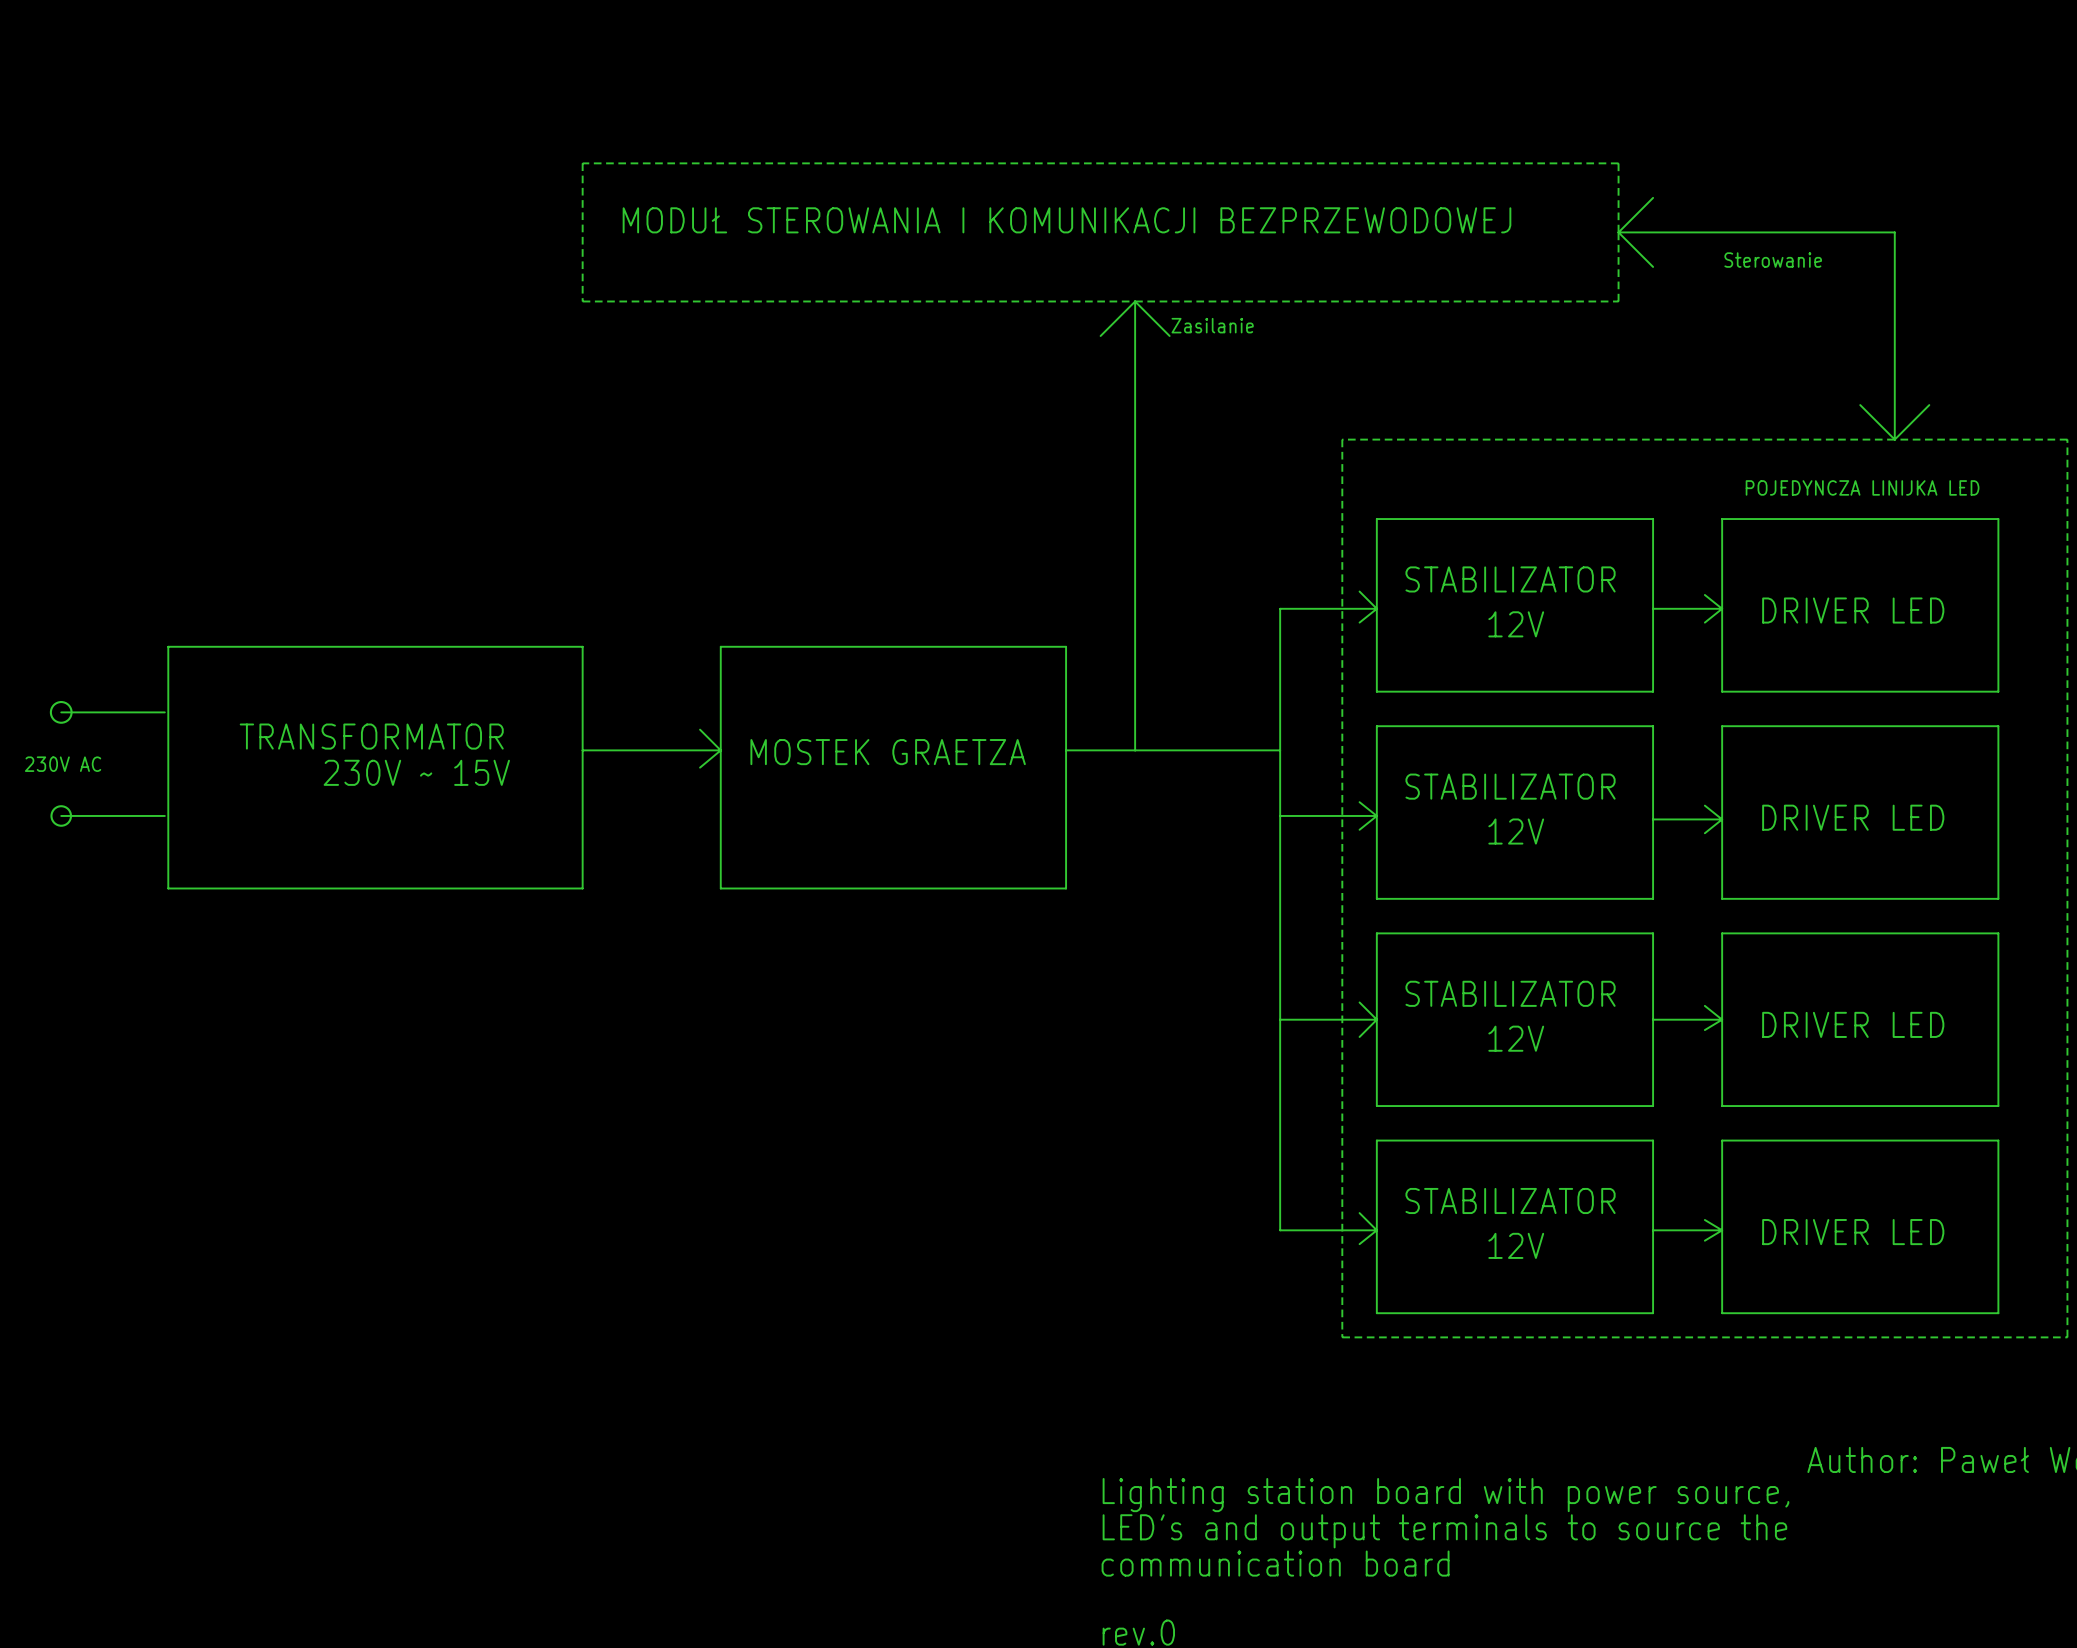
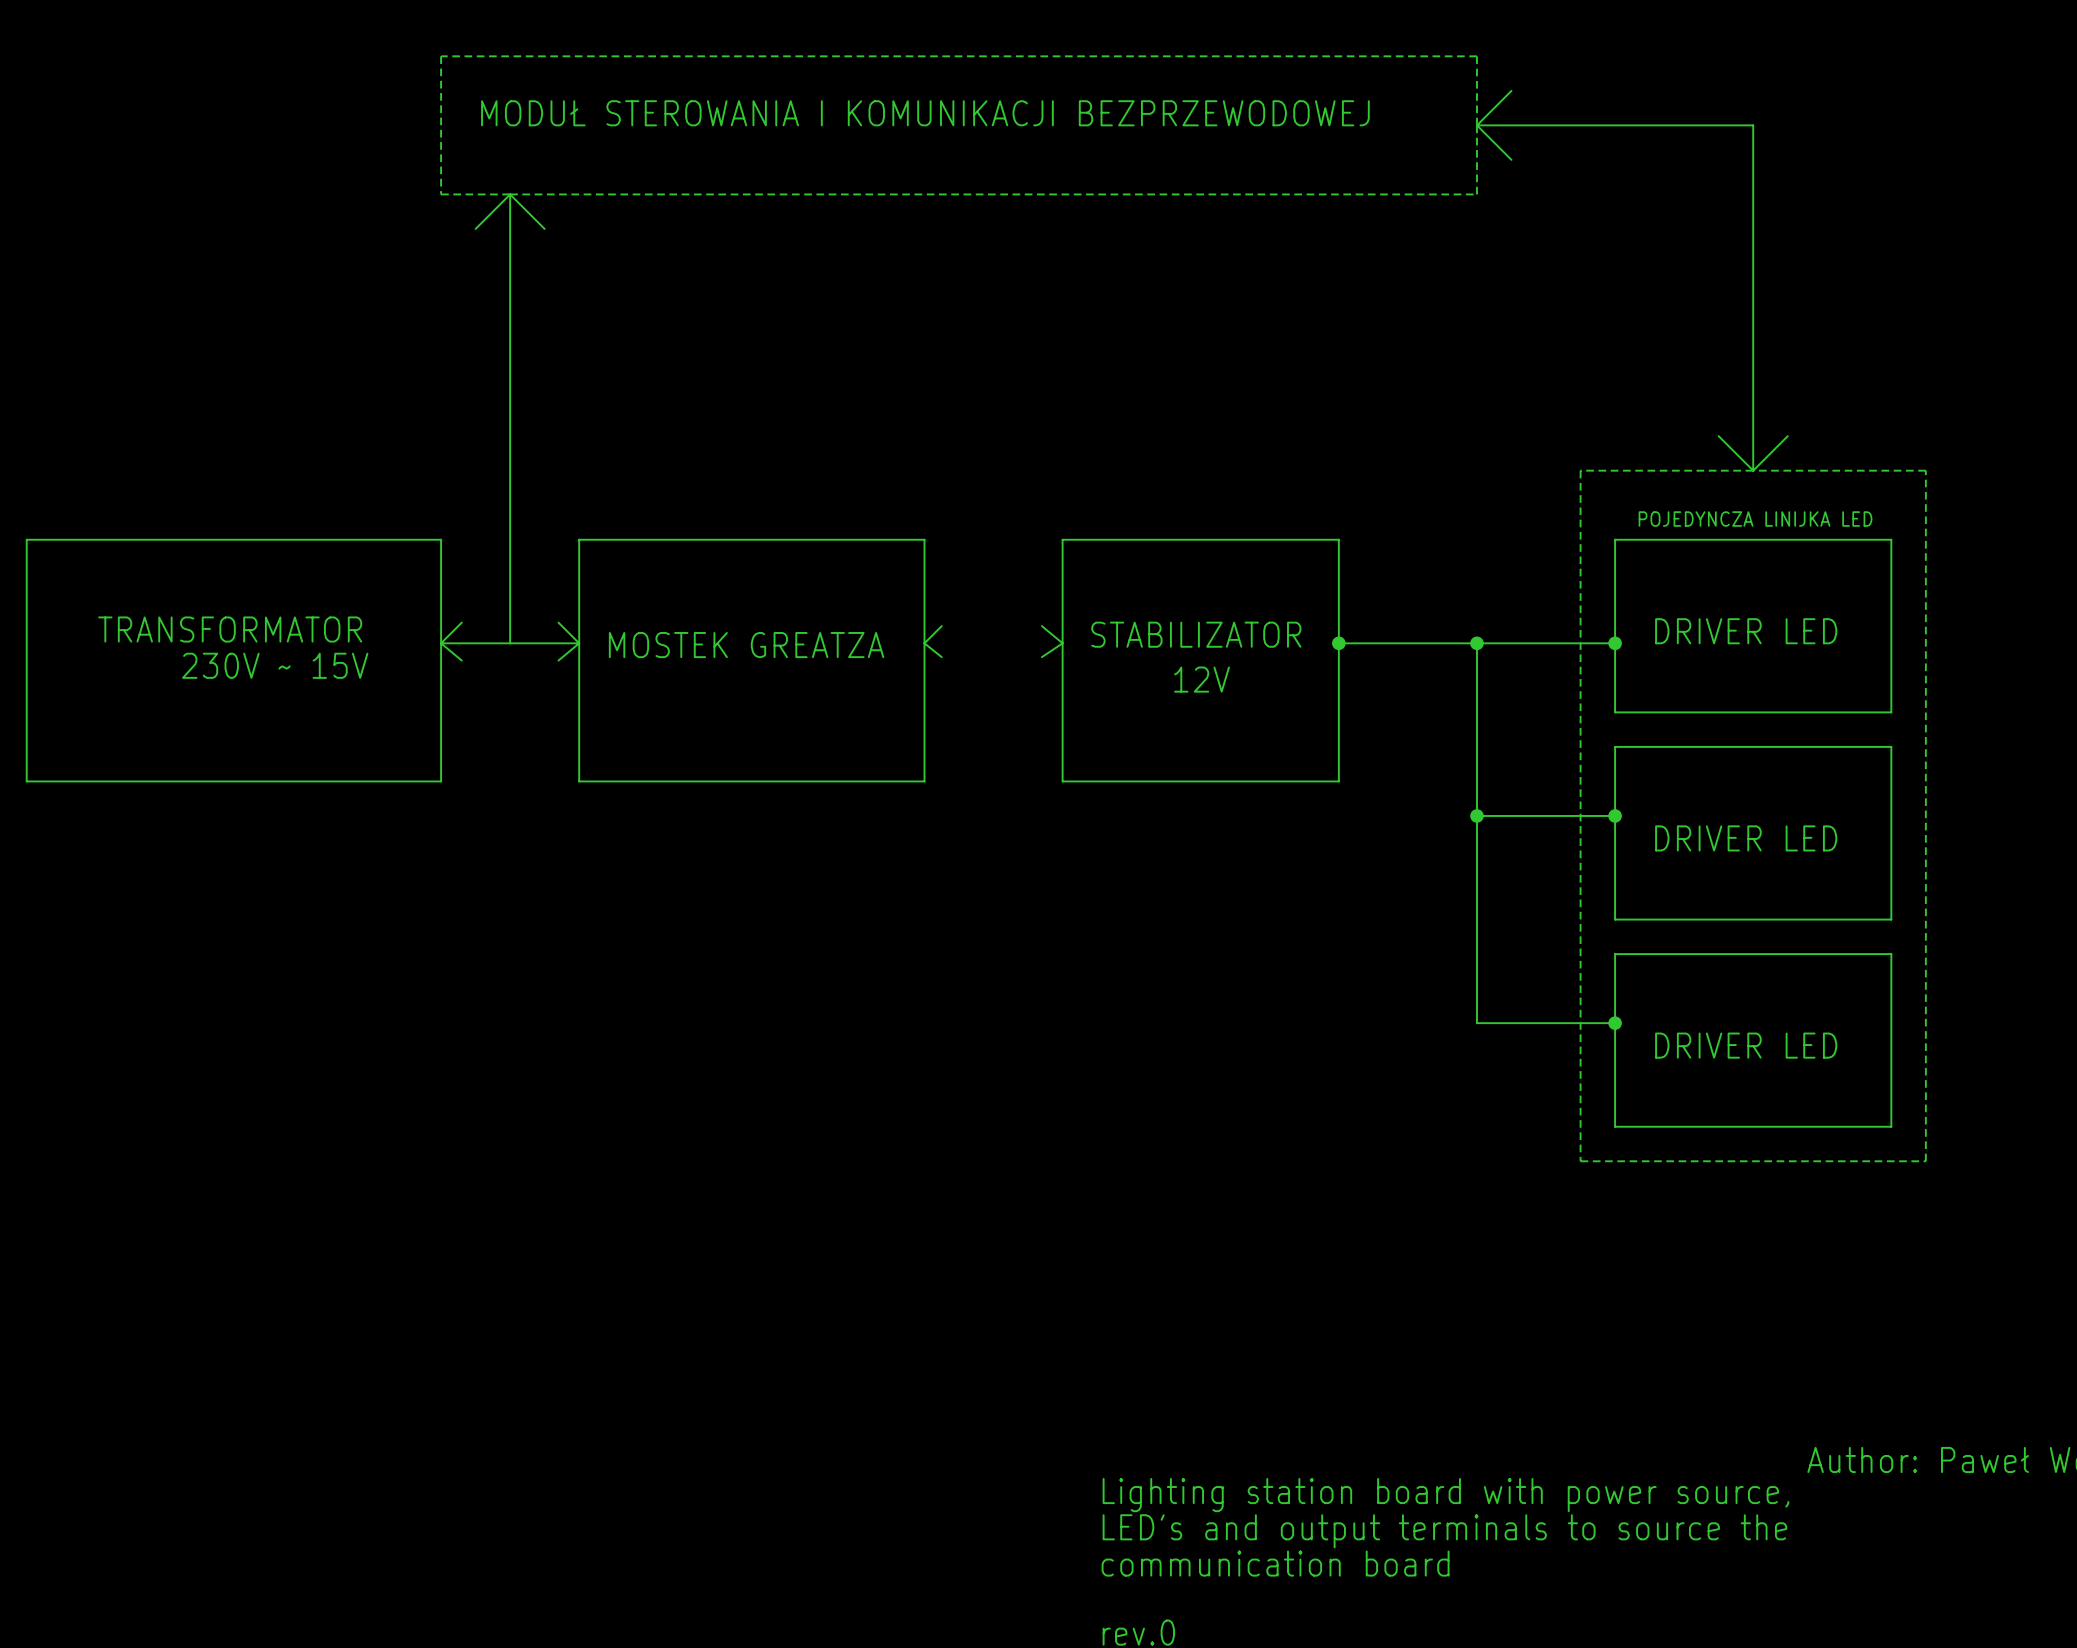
wire: none -> (1476, 125) (1753, 125) (1753, 470)
wire: (582, 163) (1618, 163) (1618, 301) (582, 301) (582, 163) -> (441, 56) (1476, 56) (1476, 194) (441, 194) (441, 56)
wire: none -> (510, 194) (510, 643)
wire: none -> (510, 194) (475, 228)
wire: none -> (510, 194) (544, 228)
wire: (1653, 197) (1618, 232) -> (1511, 90) (1476, 125)
text position: MODUŁ STEROWANIA I KOMUNIKACJI BEZPRZEWODOWEJ (1066, 220) -> MODUŁ STEROWANIA I KOMUNIKACJI BEZPRZEWODOWEJ (925, 113)
wire: (1618, 232) (1653, 266) -> (1476, 125) (1511, 159)
wire: (1618, 232) (1894, 232) (1894, 439) -> none
text: Sterowanie (1773, 260) -> none
wire: (1135, 301) (1135, 750) -> none
wire: (1135, 301) (1100, 336) -> none
wire: (1135, 301) (1169, 336) -> none
text: Zasilanie (1212, 325) -> none
wire: (1860, 405) (1894, 439) -> (1718, 436) (1753, 470)
wire: (1929, 405) (1894, 439) -> (1787, 436) (1753, 470)
wire: (1342, 439) (1342, 1337) (2067, 1337) (2067, 439) (1342, 439) -> none
wire: none -> (1580, 470) (1580, 1161) (1925, 1161) (1925, 470) (1580, 470)
text position: POJEDYNCZA LINIJKA LED (1862, 487) -> POJEDYNCZA LINIJKA LED (1755, 519)
wire: (1376, 519) (1376, 691) (1653, 691) (1653, 519) (1376, 519) -> none
wire: (1722, 519) (1998, 519) (1998, 691) (1722, 691) (1722, 519) -> (1615, 539) (1891, 539) (1891, 712) (1615, 712) (1615, 539)
wire: none -> (1062, 539) (1338, 539) (1338, 781) (1062, 781) (1062, 539)
text: STABILIZATOR (1510, 579) -> none
wire: (1359, 591) (1376, 608) -> none
wire: (1704, 594) (1722, 608) -> none
wire: (1376, 608) (1280, 608) (1280, 1230) (1376, 1230) -> none
wire: (1376, 608) (1359, 622) -> none
wire: (1653, 608) (1722, 608) -> none
wire: (1722, 608) (1704, 622) -> none
text position: DRIVER LED (1853, 610) -> DRIVER LED (1746, 631)
wire: none -> (461, 622) (441, 643)
text: 12V (1516, 624) -> none
wire: none -> (941, 626) (924, 643) (941, 657)
wire: none -> (1041, 626) (1062, 643) (1041, 657)
text: none -> STABILIZATOR (1196, 634)
wire: none -> (441, 643) (461, 660)
wire: none -> (1338, 643) (1615, 643)
junction: none -> (1338, 643)
wire: none -> (1476, 643) (1476, 1023) (1615, 1023)
junction: none -> (1476, 643)
junction: none -> (1615, 643)
text: none -> MOSTEK GREATZA (746, 645)
wire: (168, 646) (168, 888) (582, 888) (582, 646) (168, 646) -> (26, 539) (26, 781) (441, 781) (441, 539) (26, 539)
wire: (720, 646) (1066, 646) (1066, 888) (720, 888) (720, 646) -> (579, 539) (924, 539) (924, 781) (579, 781) (579, 539)
text: none -> 12V (1202, 679)
drawing: [49, 700, 73, 724] -> none
wire: (61, 712) (164, 712) -> none
wire: (1376, 726) (1653, 726) (1653, 898) (1376, 898) (1376, 726) -> none
wire: (1722, 726) (1998, 726) (1998, 898) (1722, 898) (1722, 726) -> (1615, 746) (1891, 746) (1891, 919) (1615, 919) (1615, 746)
wire: (700, 729) (720, 750) -> (558, 622) (579, 643)
text position: TRANSFORMATOR (371, 736) -> TRANSFORMATOR (230, 629)
wire: (582, 750) (720, 750) -> (441, 643) (579, 643)
wire: (720, 750) (700, 767) -> (579, 643) (558, 660)
wire: (1066, 750) (1280, 750) -> none
text: MOSTEK GRAETZA (888, 752) -> none
text: 230V AC (63, 764) -> none
text position: 230V ~ 15V (416, 772) -> 230V ~ 15V (275, 665)
text: STABILIZATOR (1510, 786) -> none
wire: (1359, 802) (1376, 815) -> none
drawing: [50, 805, 73, 827] -> none
wire: (1704, 805) (1722, 819) -> none
wire: (61, 815) (164, 815) -> none
wire: (1280, 815) (1376, 815) -> none
wire: (1376, 815) (1359, 829) -> none
wire: none -> (1476, 815) (1615, 815)
junction: none -> (1476, 815)
junction: none -> (1615, 815)
text position: DRIVER LED (1853, 817) -> DRIVER LED (1746, 838)
wire: (1653, 819) (1722, 819) -> none
wire: (1722, 819) (1704, 833) -> none
text: 12V (1516, 831) -> none
wire: (1376, 933) (1376, 1106) (1653, 1106) (1653, 933) (1376, 933) -> none
wire: (1722, 933) (1998, 933) (1998, 1106) (1722, 1106) (1722, 933) -> (1615, 954) (1891, 954) (1891, 1126) (1615, 1126) (1615, 954)
text: STABILIZATOR (1510, 993) -> none
wire: (1359, 1002) (1376, 1019) -> none
wire: (1704, 1005) (1722, 1019) -> none
wire: (1280, 1019) (1376, 1019) -> none
wire: (1376, 1019) (1359, 1036) -> none
wire: (1653, 1019) (1722, 1019) -> none
wire: (1722, 1019) (1704, 1030) -> none
junction: none -> (1615, 1023)
text position: DRIVER LED (1853, 1024) -> DRIVER LED (1746, 1045)
text: 12V (1516, 1038) -> none
wire: (1376, 1140) (1376, 1313) (1653, 1313) (1653, 1140) (1376, 1140) -> none
wire: (1722, 1140) (1998, 1140) (1998, 1313) (1722, 1313) (1722, 1140) -> none
text: STABILIZATOR (1510, 1200) -> none
wire: (1359, 1213) (1376, 1230) -> none
wire: (1704, 1219) (1722, 1230) -> none
wire: (1376, 1230) (1359, 1244) -> none
wire: (1653, 1230) (1722, 1230) -> none
wire: (1722, 1230) (1704, 1240) -> none
text: DRIVER LED (1853, 1232) -> none
text: 12V (1516, 1245) -> none

